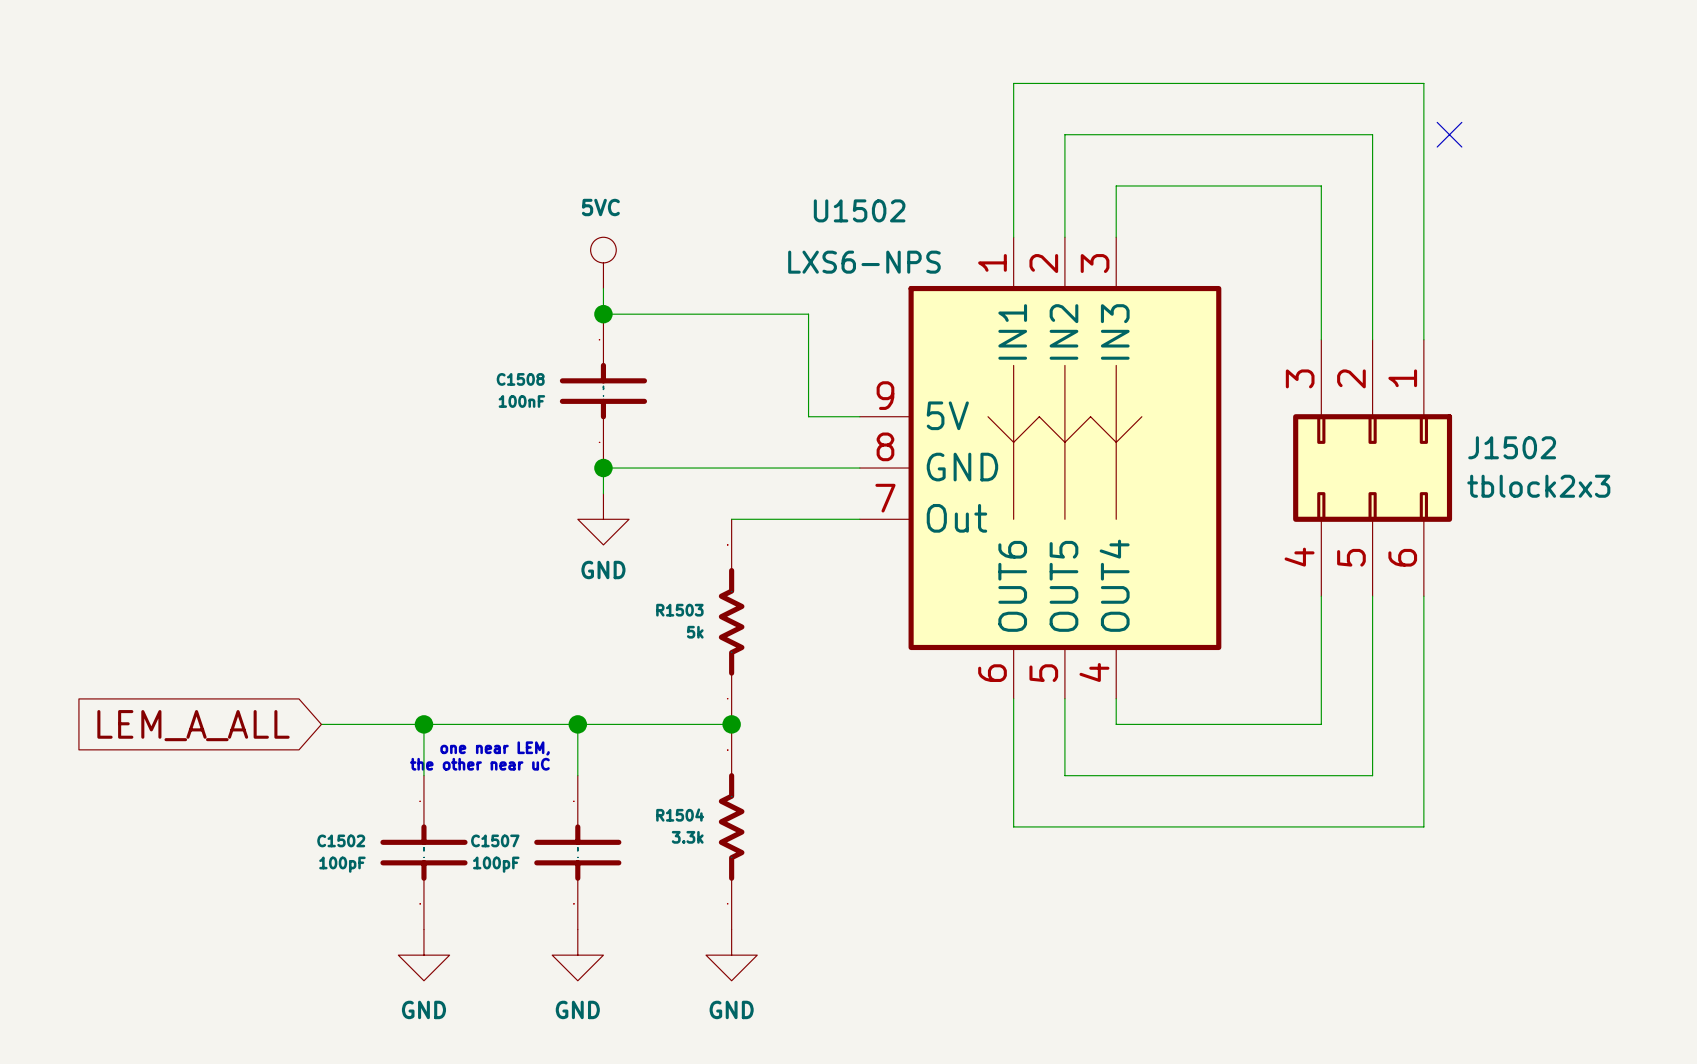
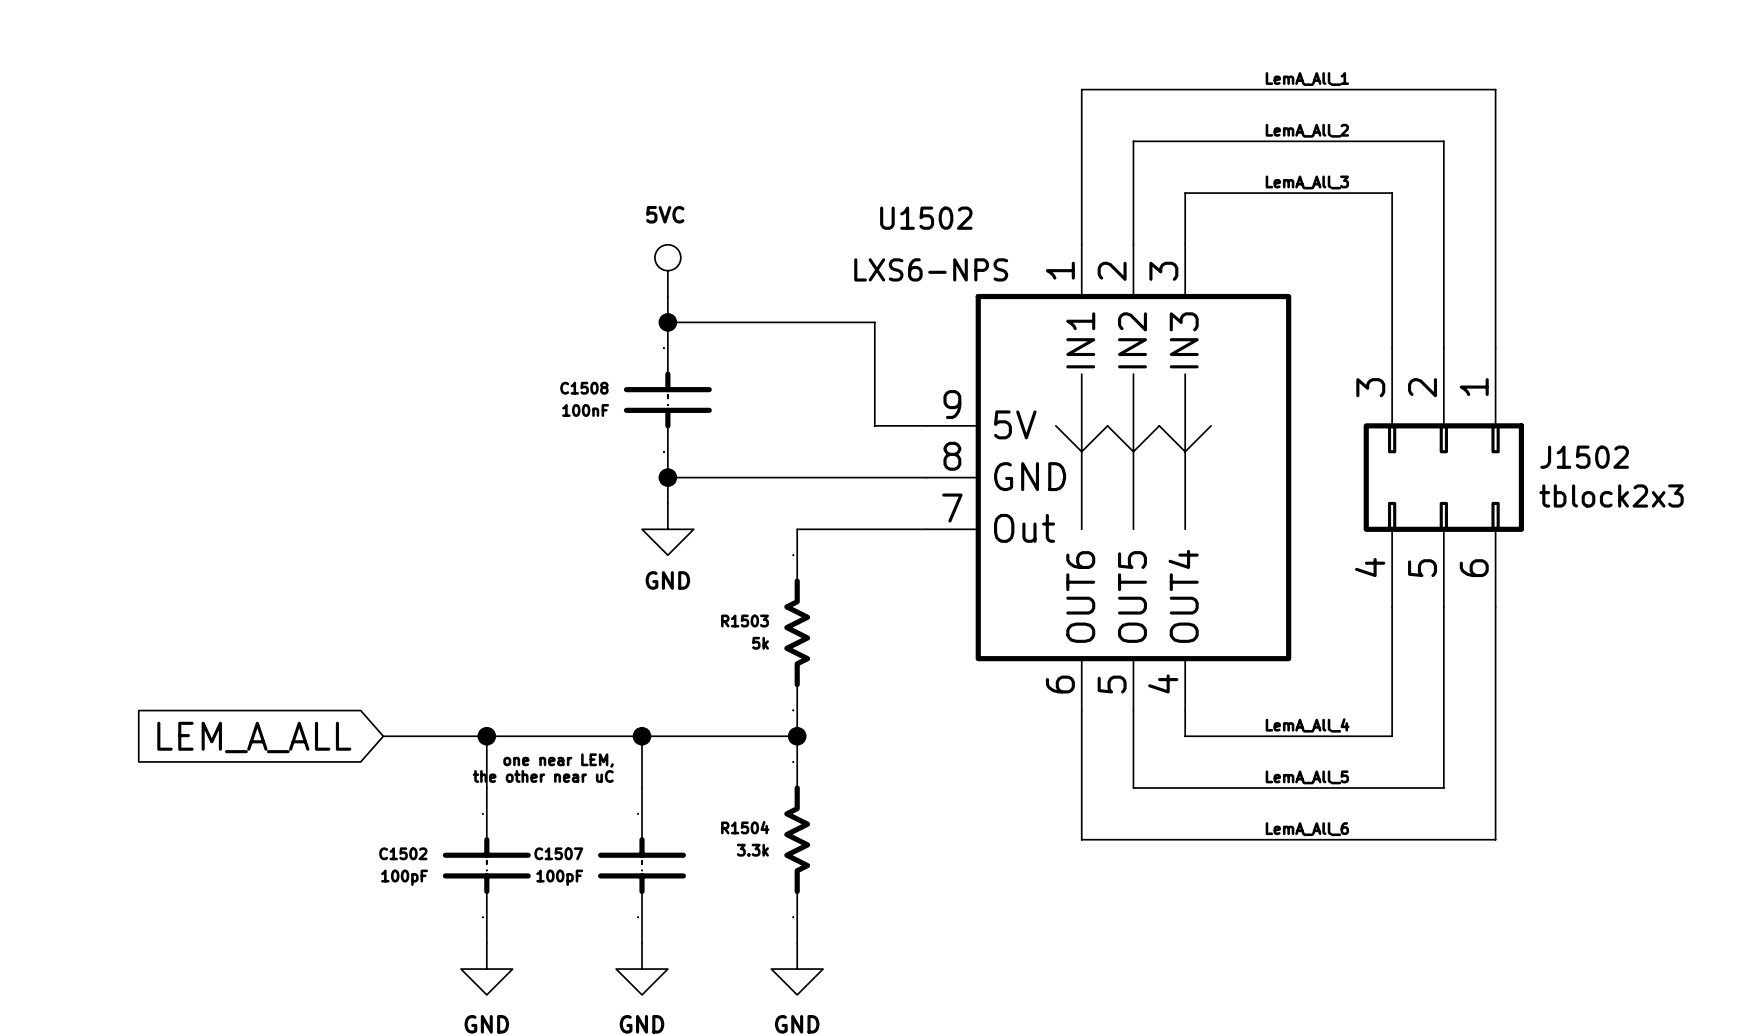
label: none -> LemA_All_1 (1307, 79)
label: none -> LemA_All_2 (1307, 130)
no-connect mark: (1449, 134) -> none
label: none -> LemA_All_3 (1307, 182)
label: none -> LemA_All_4 (1307, 725)
label: none -> LemA_All_5 (1307, 777)
label: none -> LemA_All_6 (1307, 829)

